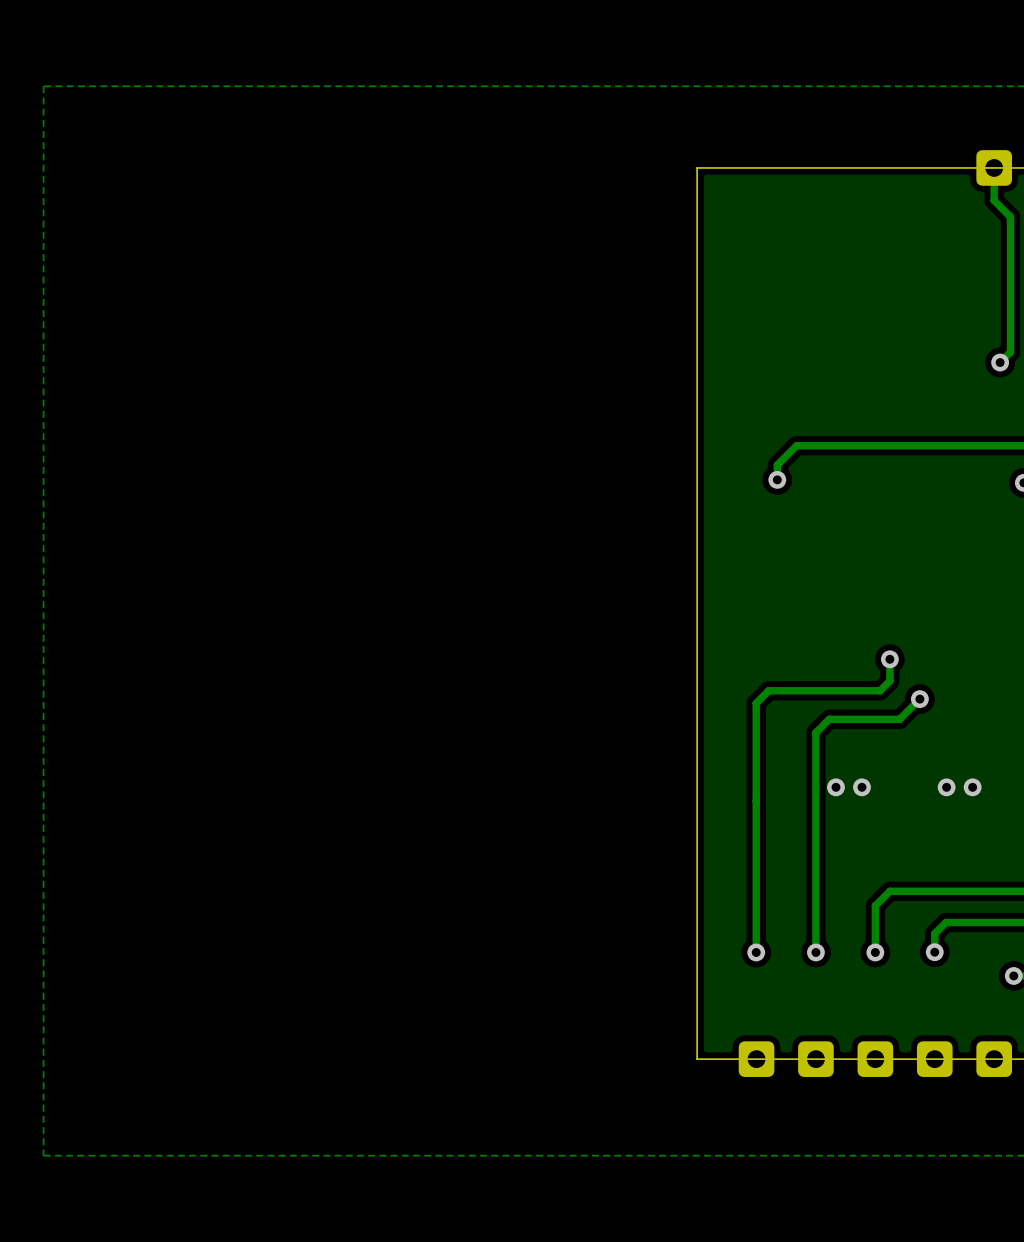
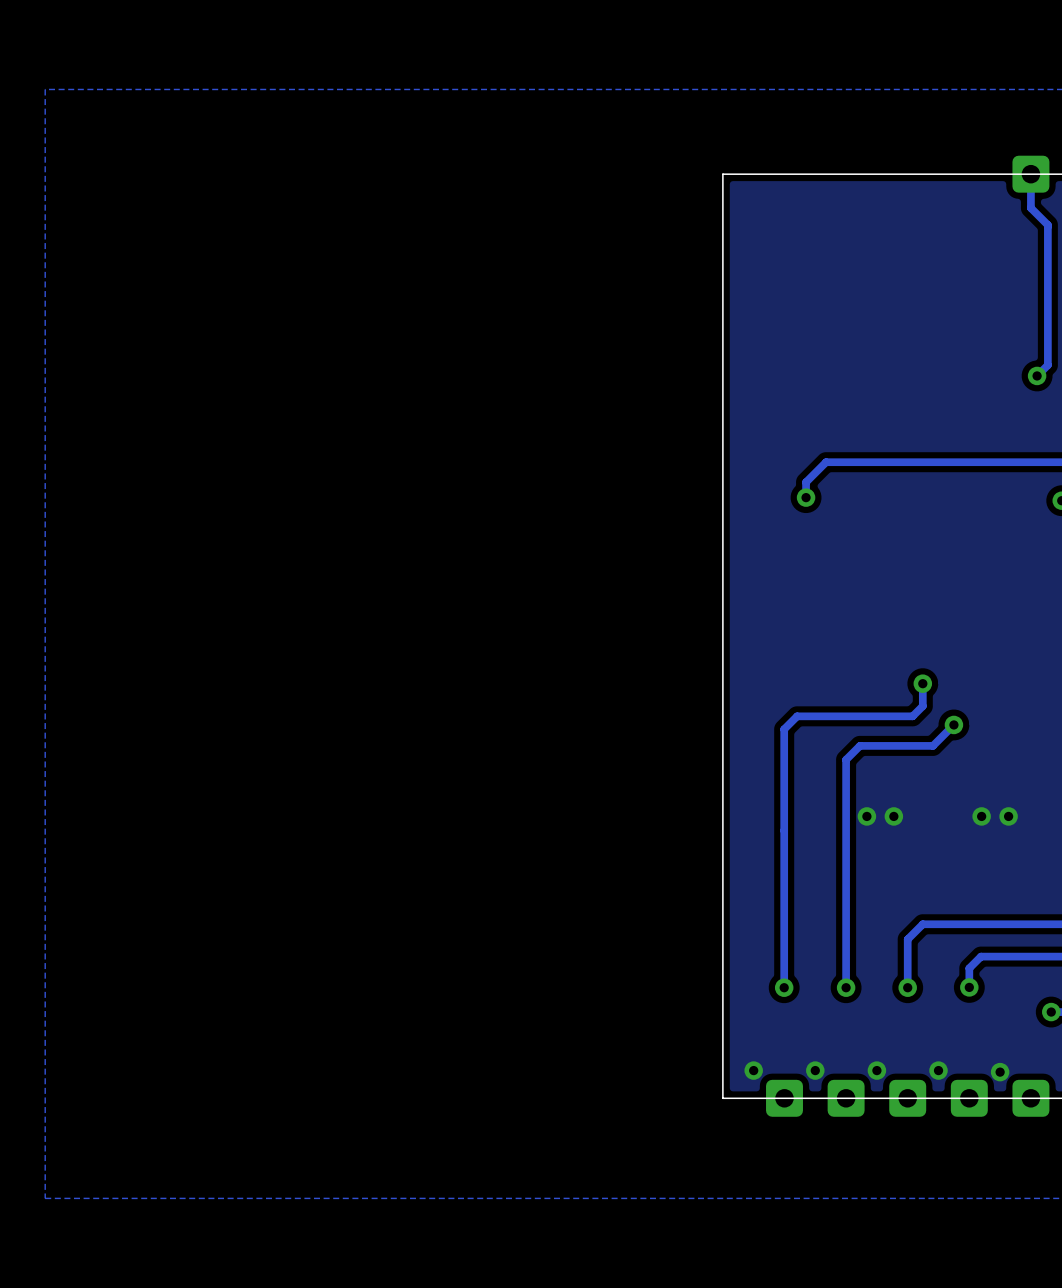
via: none -> (753, 1070)
via: none -> (815, 1070)
via: none -> (876, 1070)
via: none -> (938, 1070)
via: none -> (1000, 1072)

